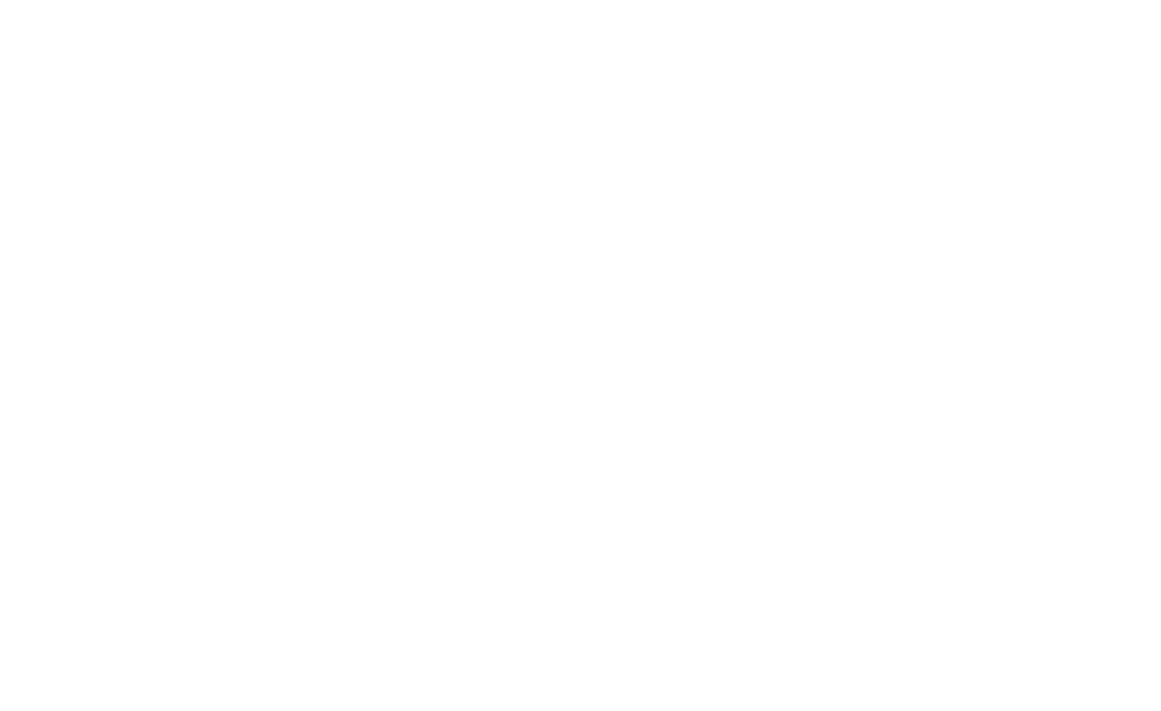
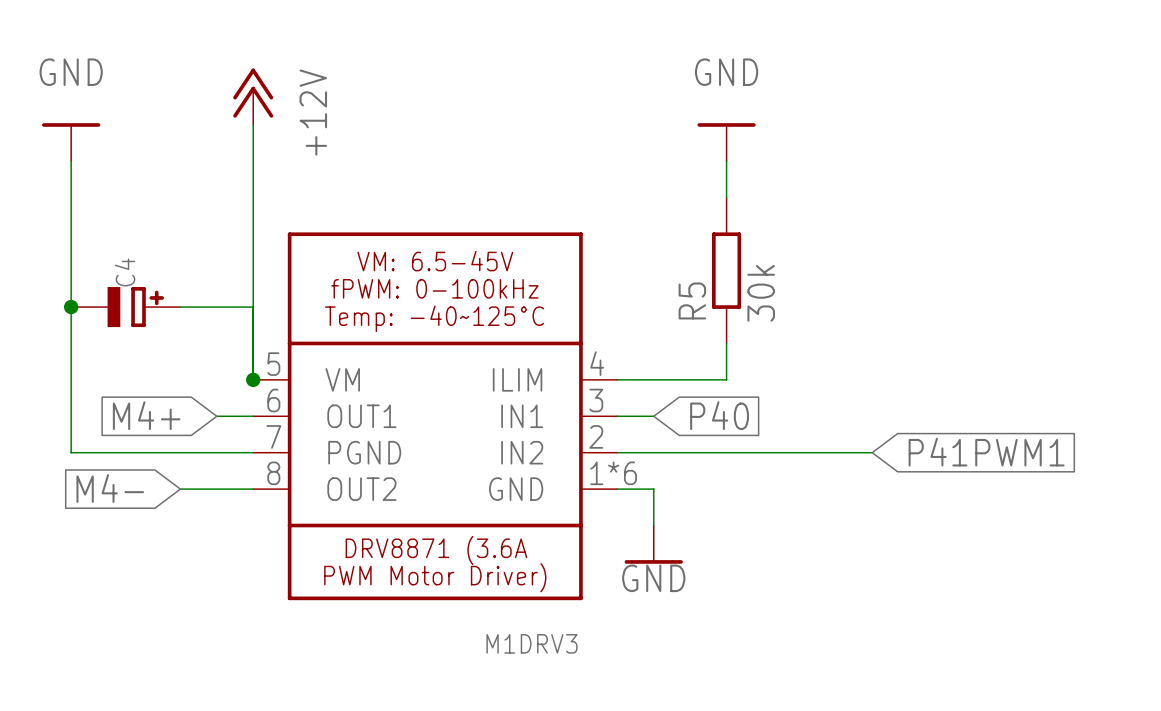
power symbol: none -> +12V (253, 96)
wire: none -> (253, 124) (253, 379)
power symbol: none -> GND (71, 142)
power symbol: none -> GND (726, 142)
wire: none -> (71, 161) (71, 452) (253, 452)
wire: none -> (726, 161) (726, 197)
R5: none -> 30k (726, 270)
junction: none -> (71, 307)
C4: none -> (125, 307)
wire: none -> (180, 307) (253, 307)
wire: none -> (726, 343) (726, 379) (617, 379)
junction: none -> (253, 379)
global label: none -> M4+ (146, 415)
global label: none -> P40 (719, 415)
wire: none -> (216, 416) (253, 416)
M1DRV3: none -> (435, 416)
wire: none -> (617, 416) (653, 416)
wire: none -> (617, 452) (872, 452)
global label: none -> P41PWM1 (986, 452)
global label: none -> M4- (110, 488)
wire: none -> (180, 489) (253, 489)
wire: none -> (617, 489) (653, 489) (653, 525)
power symbol: none -> GND (653, 544)

